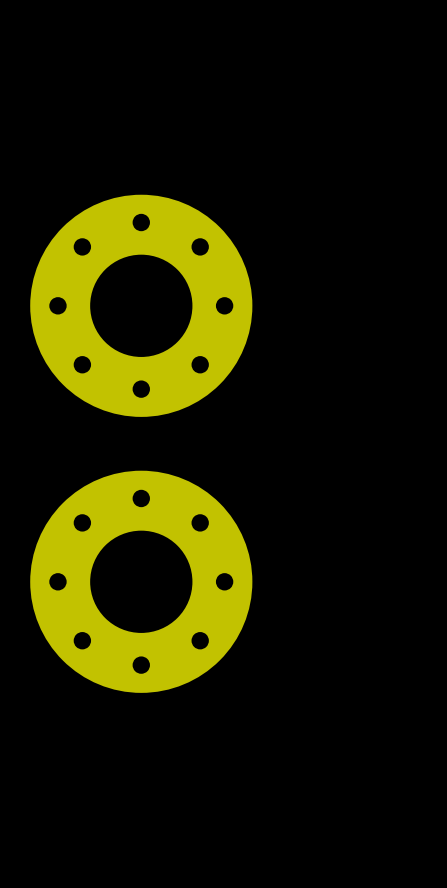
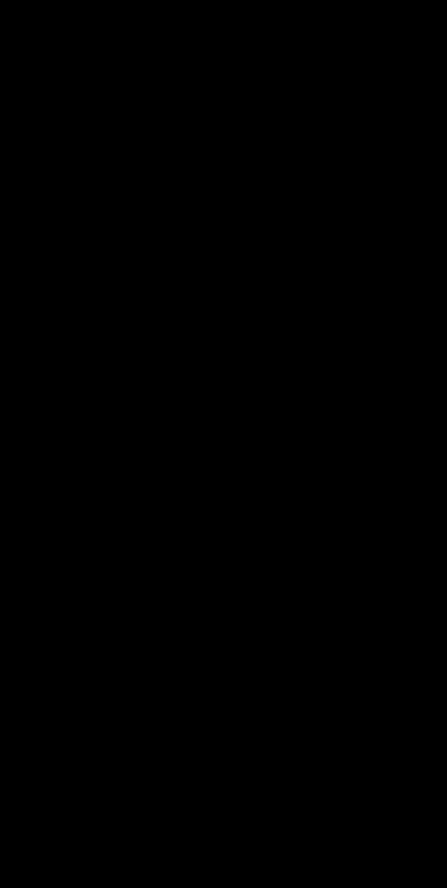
part: (141, 305) -> none
part: (141, 581) -> none

